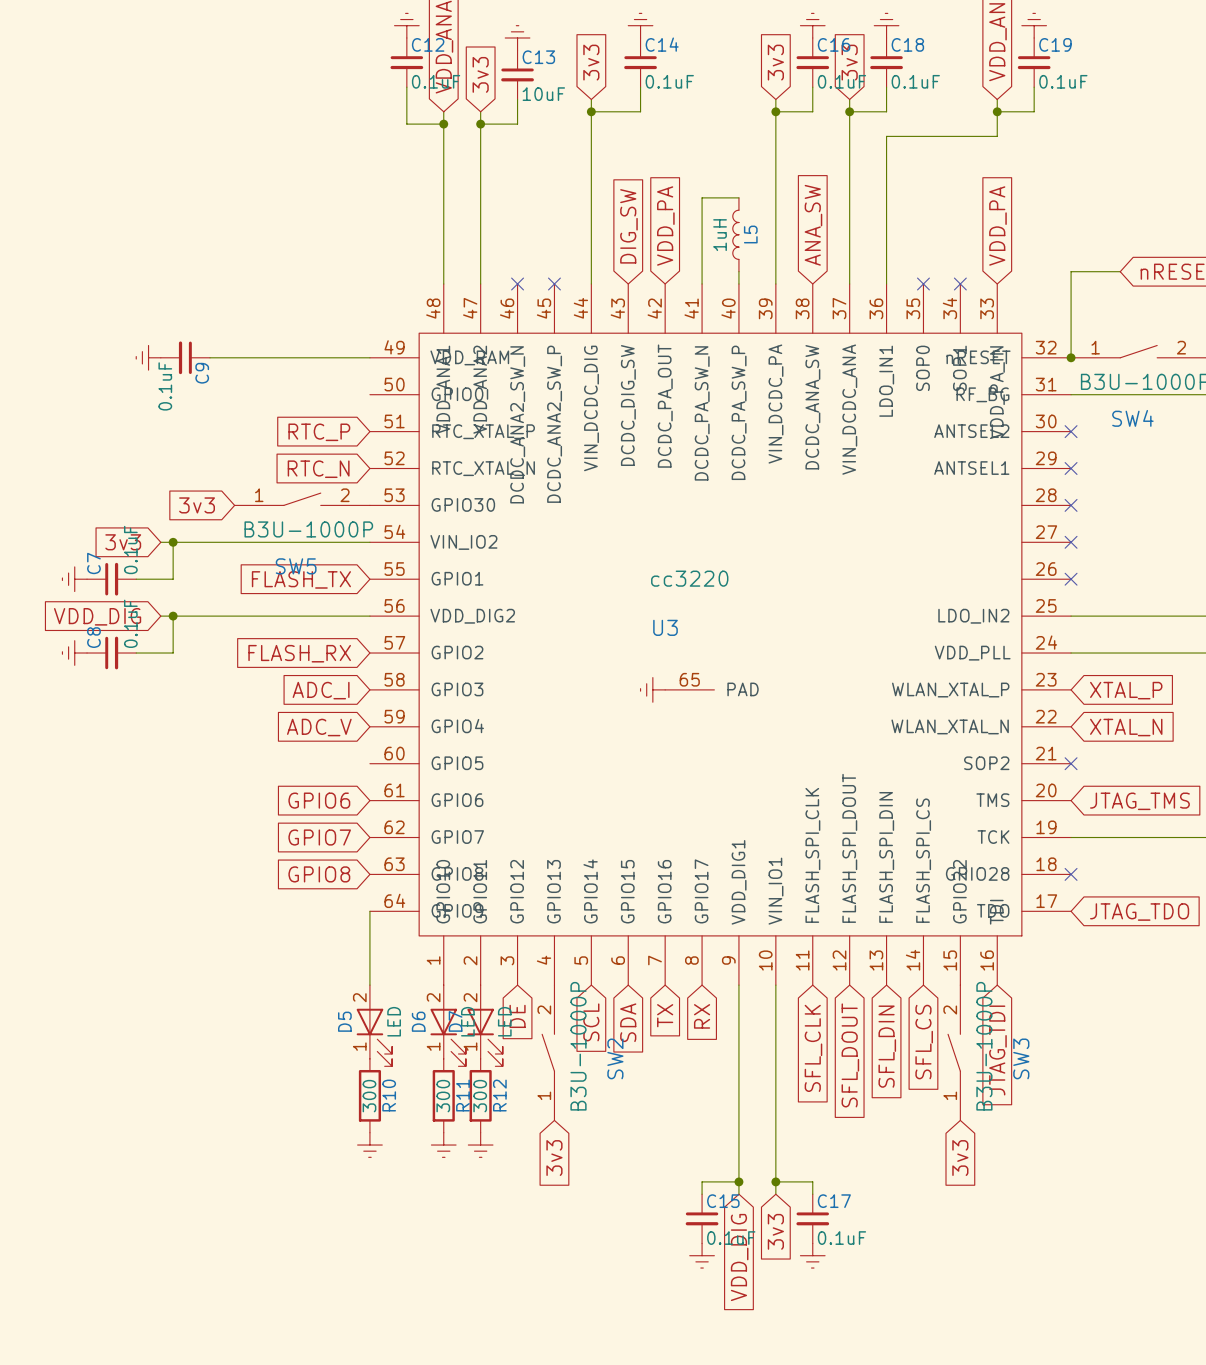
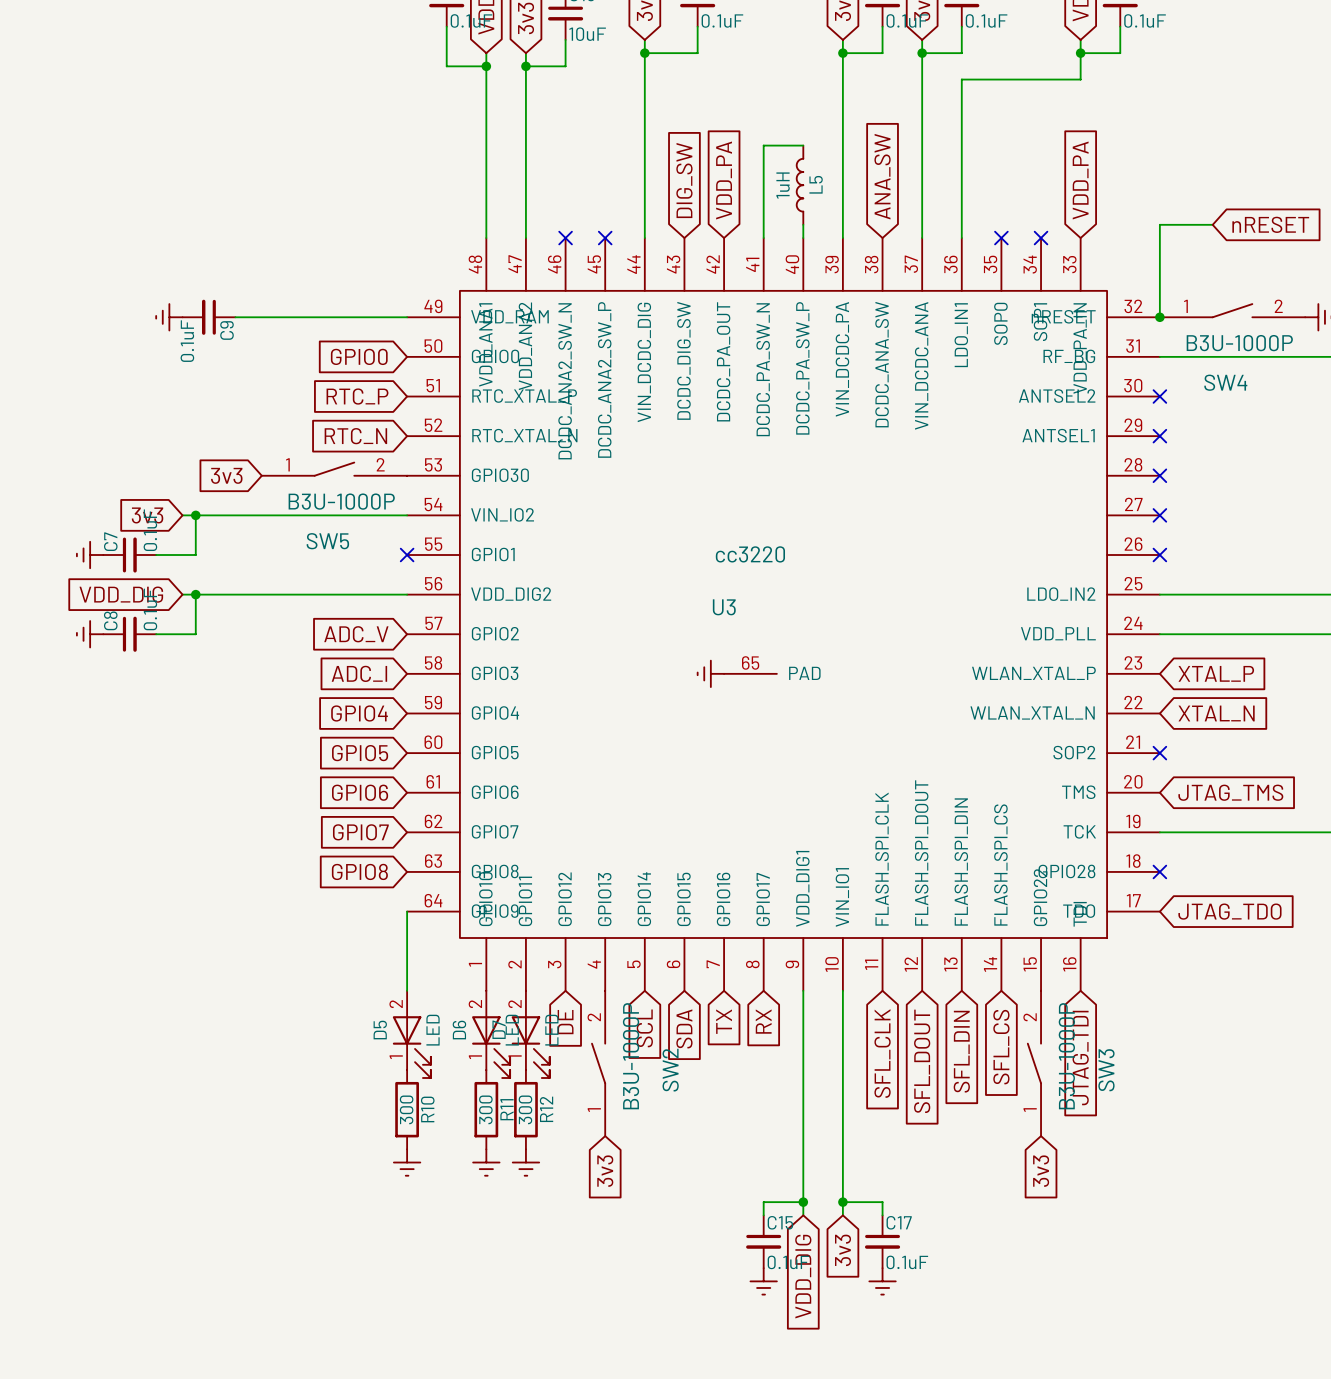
global label: none -> GPIO0 (359, 356)
global label: FLASH_TX (301, 579) -> none
no-connect mark: none -> (407, 555)
global label: FLASH_RX (299, 653) -> ADC_V (356, 634)
global label: ADC_V (319, 727) -> GPIO4 (359, 713)
global label: none -> GPIO5 (360, 753)

